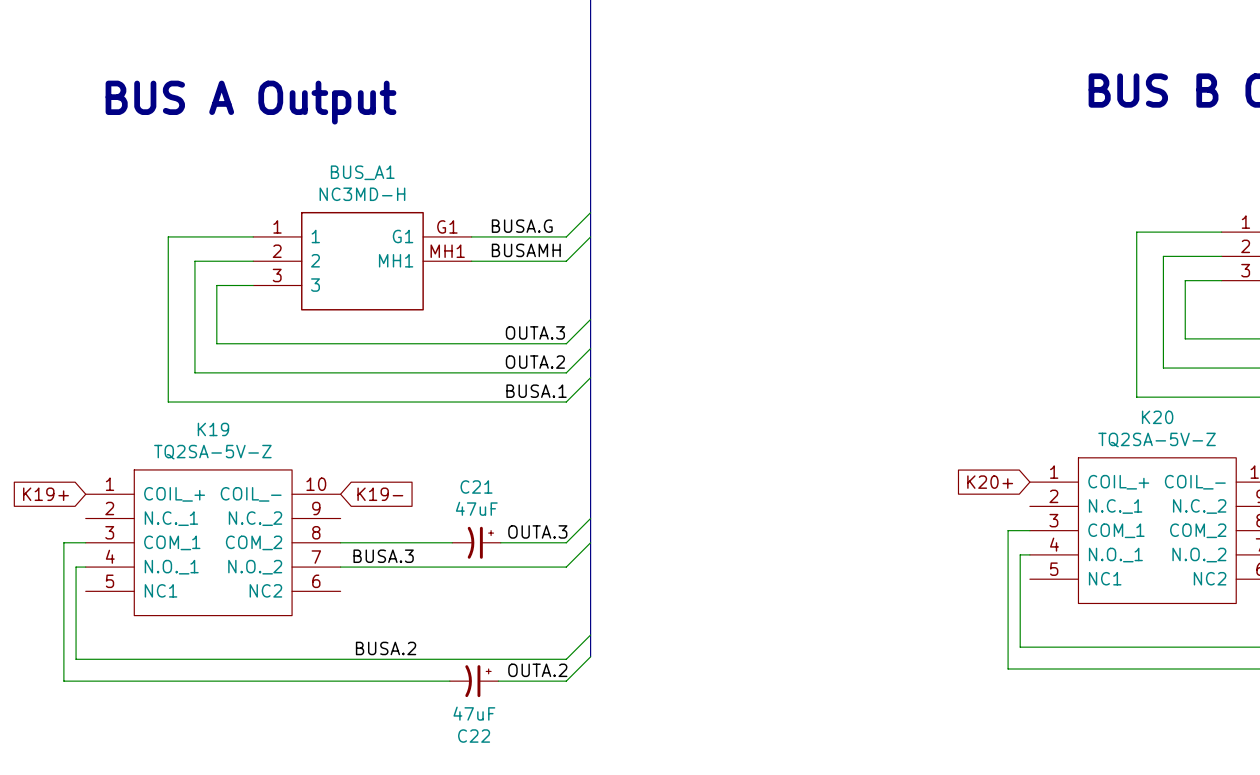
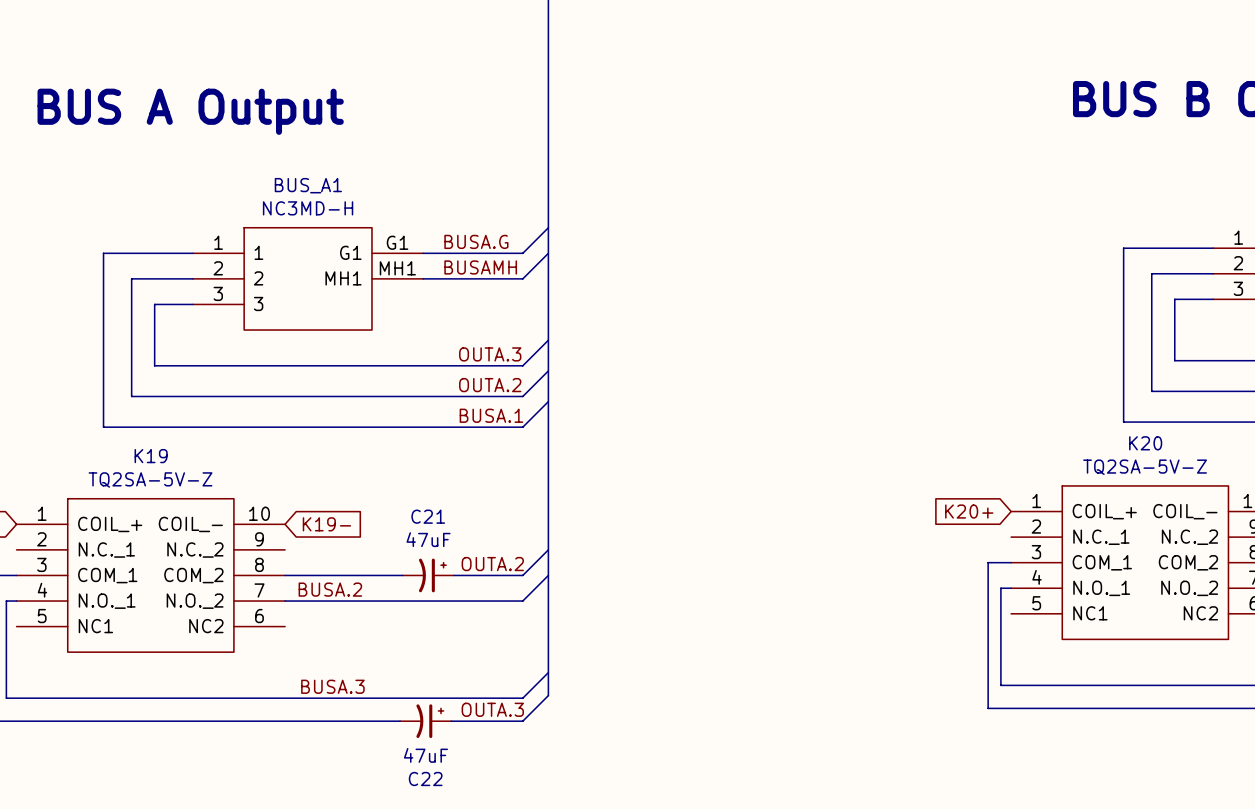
label: OUTA.3 (537, 531) -> OUTA.2 (492, 564)
label: BUSA.3 (383, 556) -> BUSA.2 (330, 589)
label: BUSA.2 (386, 648) -> BUSA.3 (332, 686)
label: OUTA.2 (537, 670) -> OUTA.3 (492, 709)

